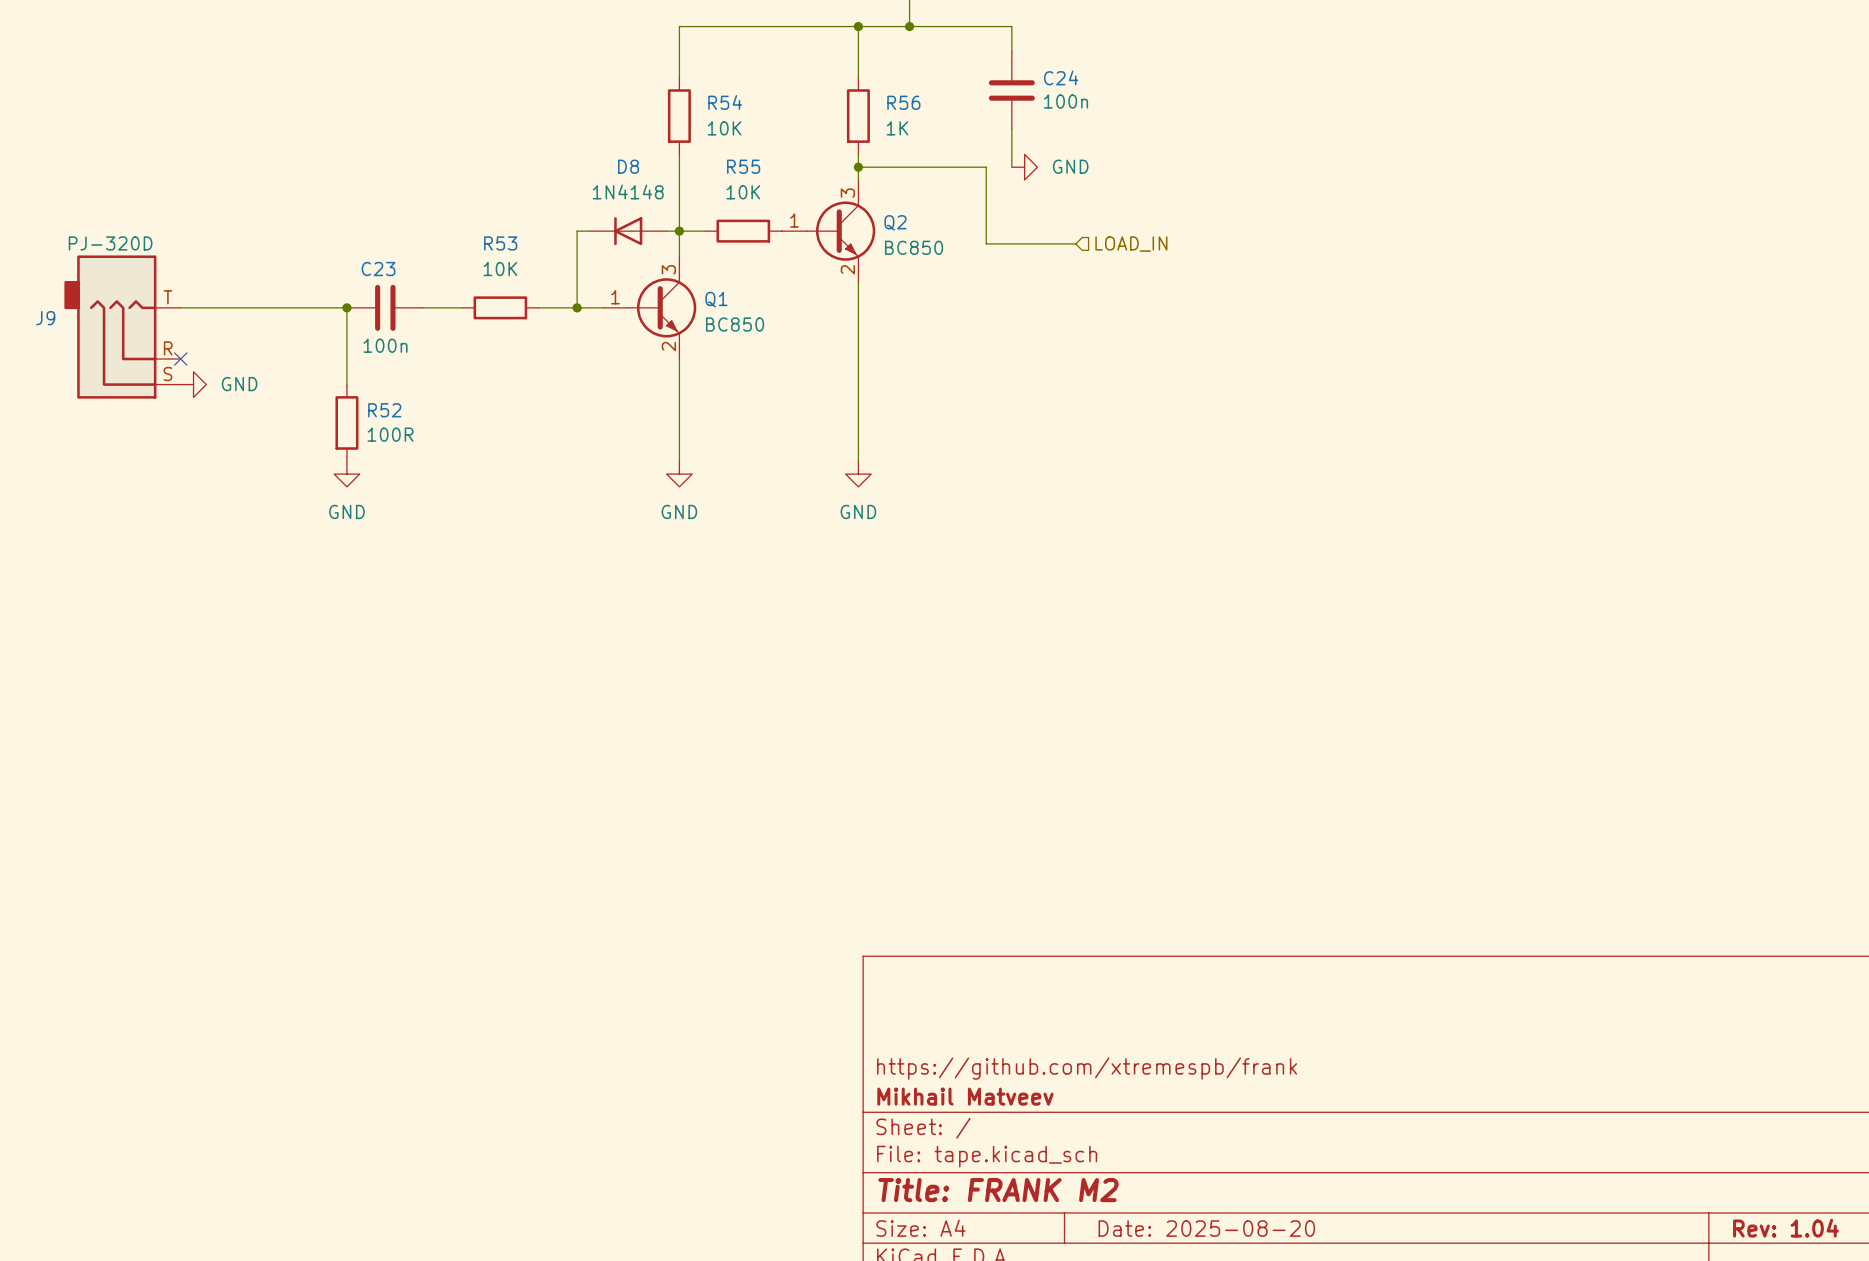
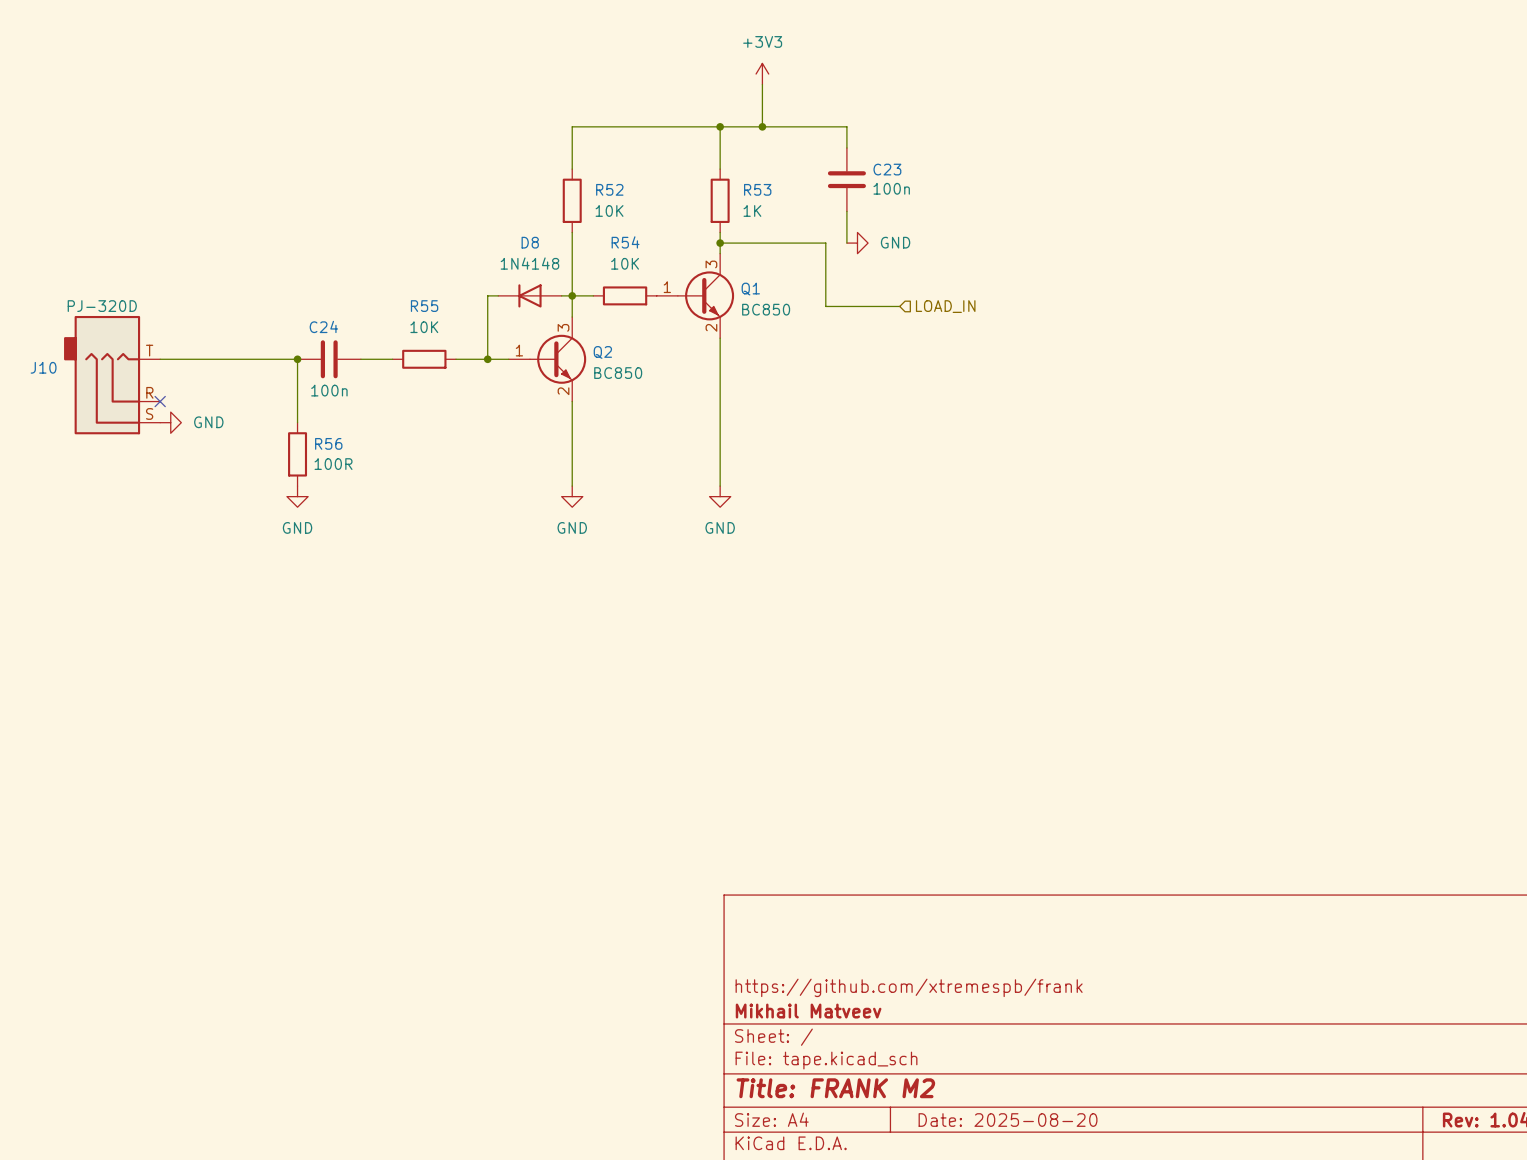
C24 name: C24 (1061, 77) -> C23 (887, 169)
R54 name: R54 (725, 102) -> R52 (609, 189)
R56 name: R56 (903, 102) -> R53 (757, 189)
R55 name: R55 (743, 166) -> R54 (625, 242)
Q2 name: Q2 (895, 222) -> Q1 (750, 289)
R53 name: R53 (500, 243) -> R55 (424, 306)
C23 name: C23 (378, 269) -> C24 (323, 326)
Q1 name: Q1 (716, 299) -> Q2 (602, 352)
J9 name: J9 (45, 318) -> J10 (43, 367)
R52 name: R52 (384, 410) -> R56 (328, 443)

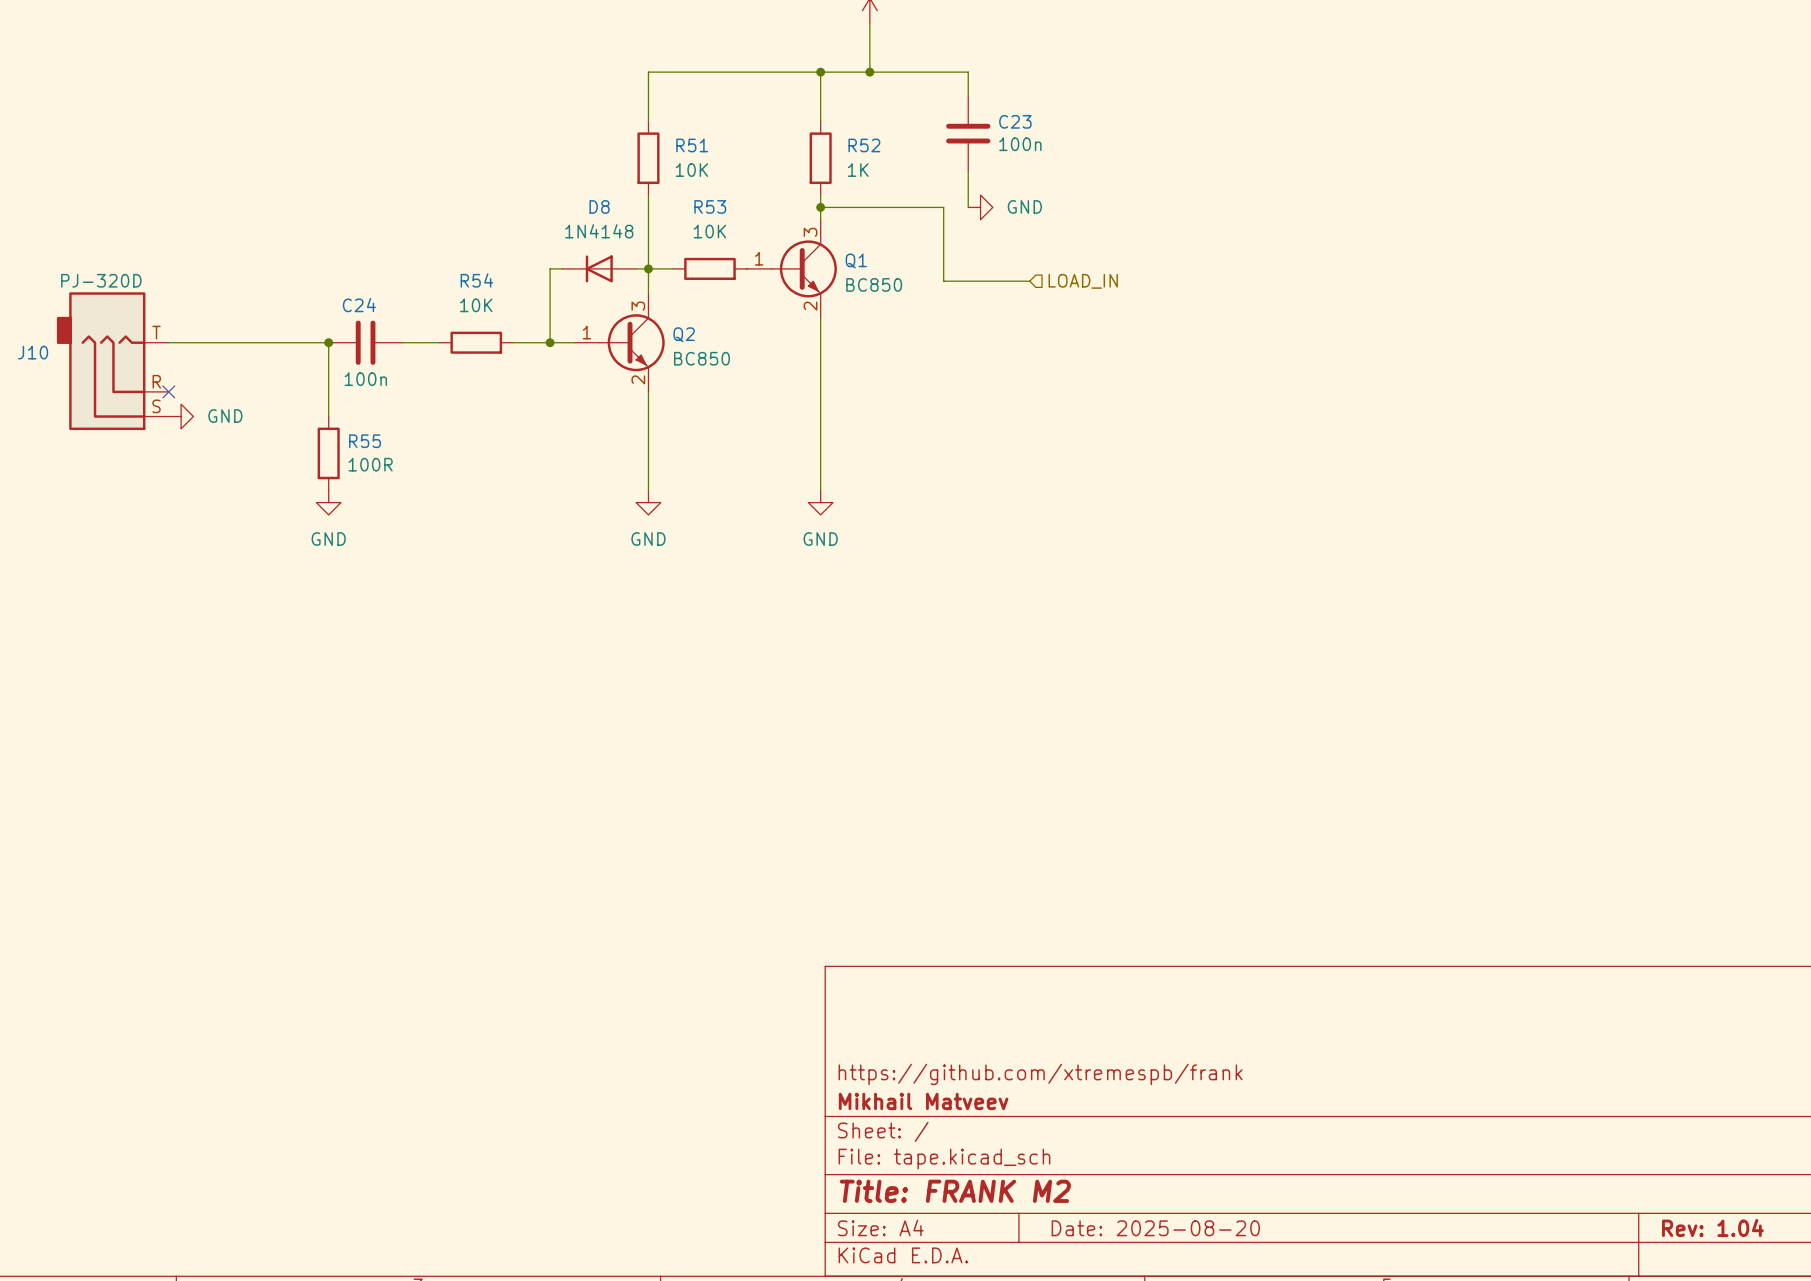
R52 name: R52 (609, 189) -> R51 (692, 145)
R53 name: R53 (757, 189) -> R52 (864, 145)
R54 name: R54 (625, 242) -> R53 (710, 206)
R55 name: R55 (424, 306) -> R54 (476, 280)
R56 name: R56 (328, 443) -> R55 (365, 441)

